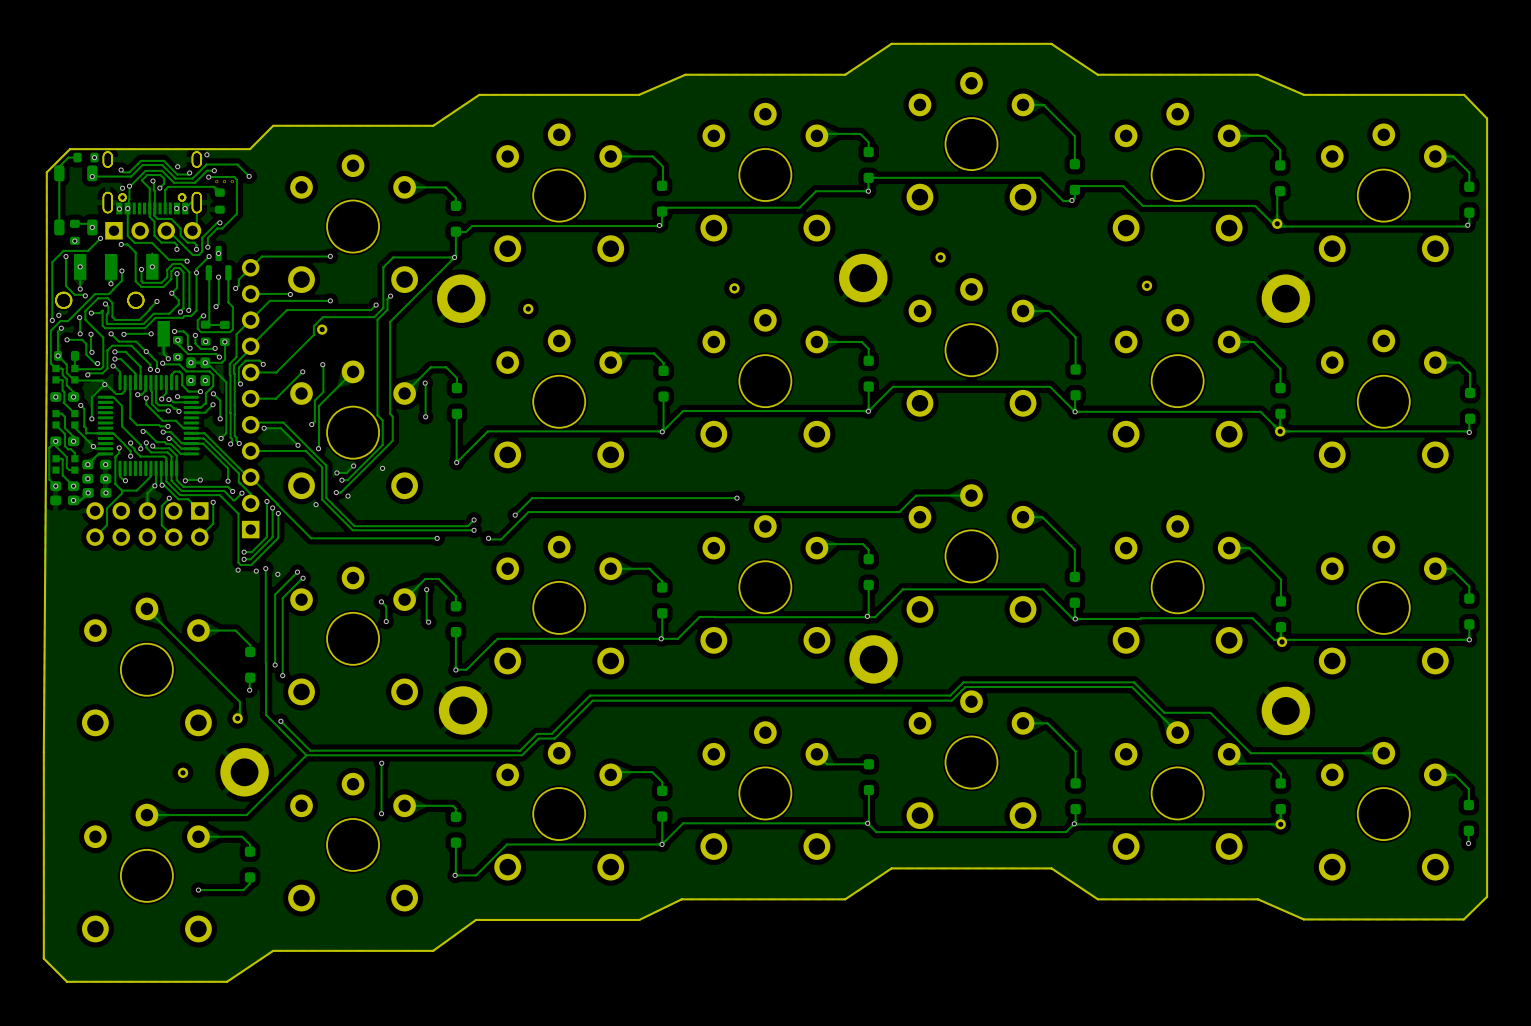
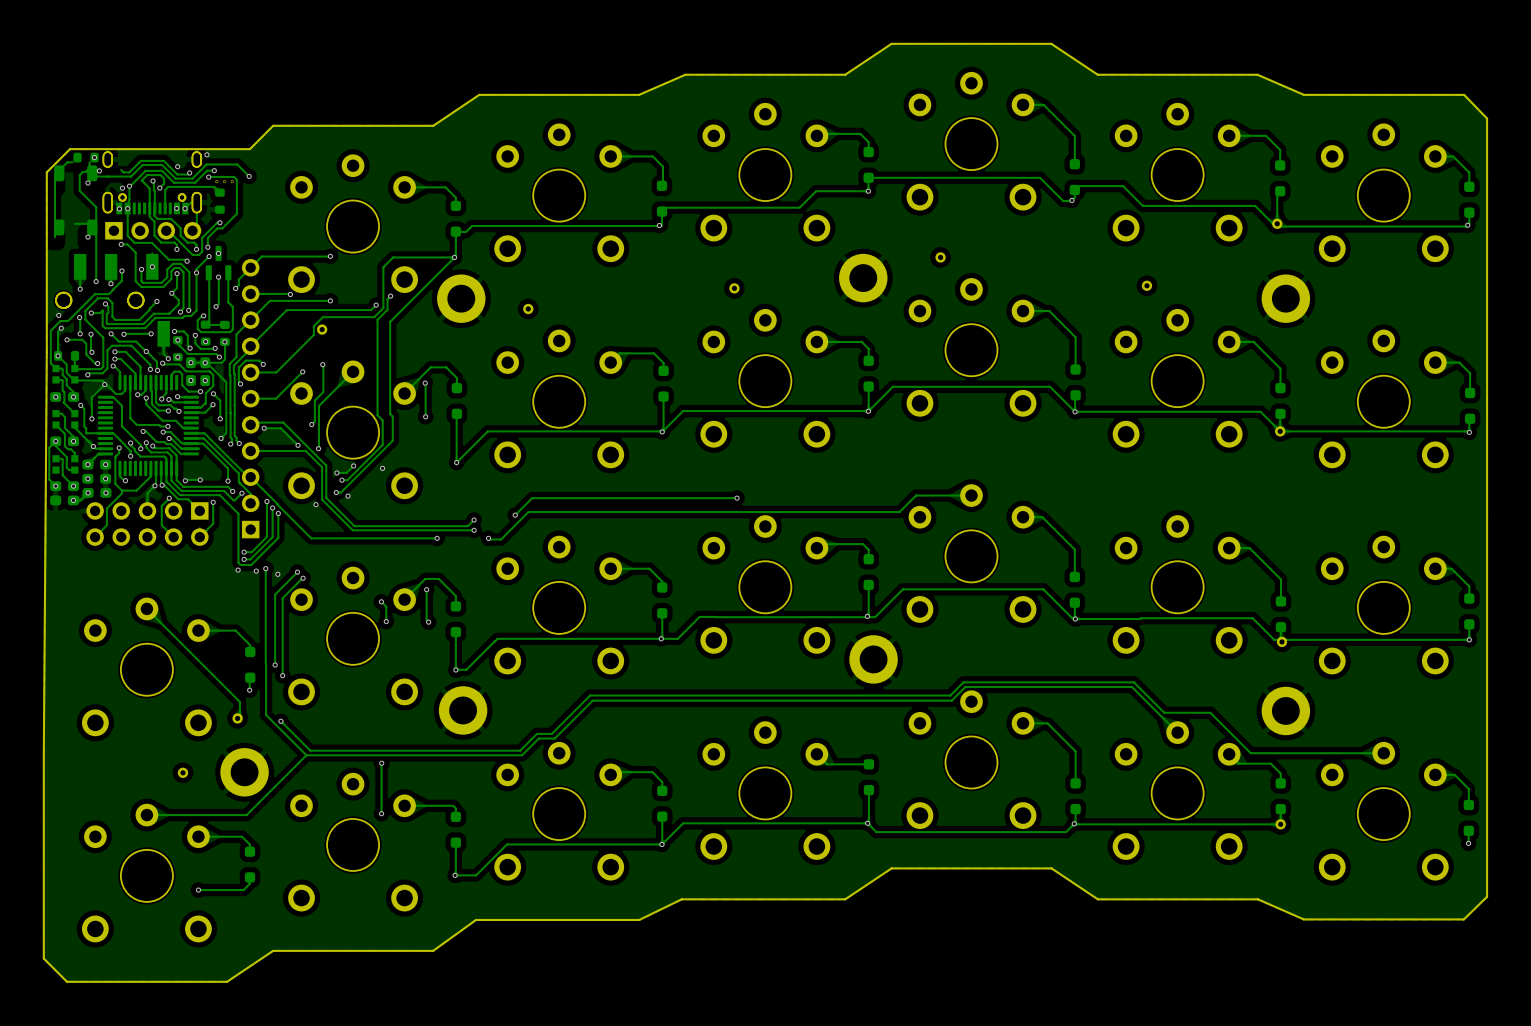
track: (77, 157) (68, 157) (59, 166) (59, 227) -> none
track: none -> (72, 162) (67, 162) (54, 174) (54, 237)
track: none -> (89, 162) (89, 168) (79, 175) (79, 190) (96, 207) (96, 281)
via: none -> (99, 170)
via: (121, 170) -> none
via: (92, 176) -> none
via: none -> (87, 183)
via: (92, 227) -> none
part: (74, 232) -> none
via: none -> (87, 237)
track: (100, 238) (88, 250) (63, 250) (52, 262) (52, 320) -> none
via: (100, 238) -> none
via: (74, 241) -> none
track: (66, 256) (66, 286) (74, 294) (85, 295) -> none
via: (66, 256) -> none
via: (80, 266) -> none
via: none -> (96, 281)
via: (85, 295) -> none
via: (52, 320) -> none

